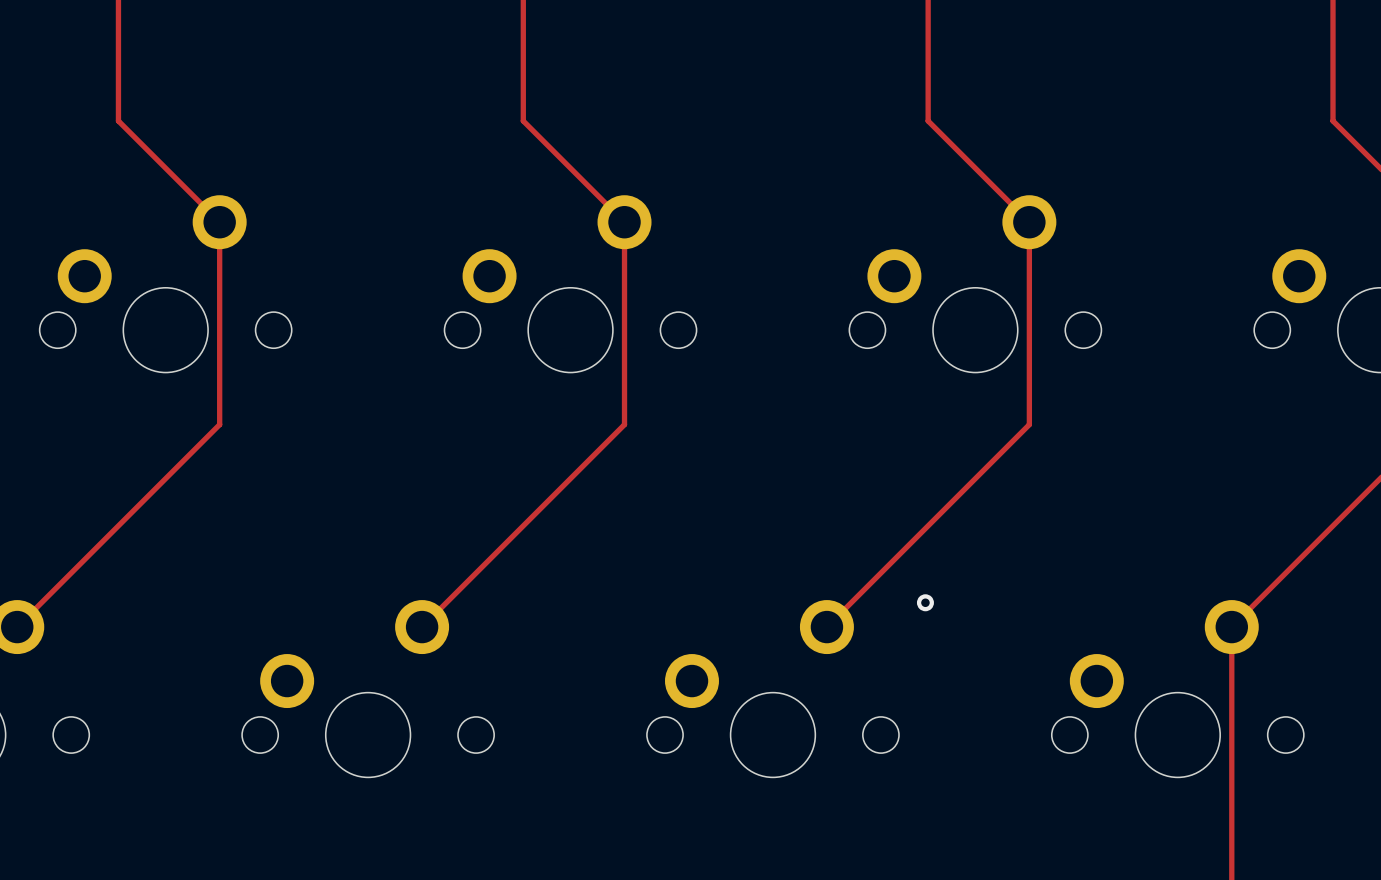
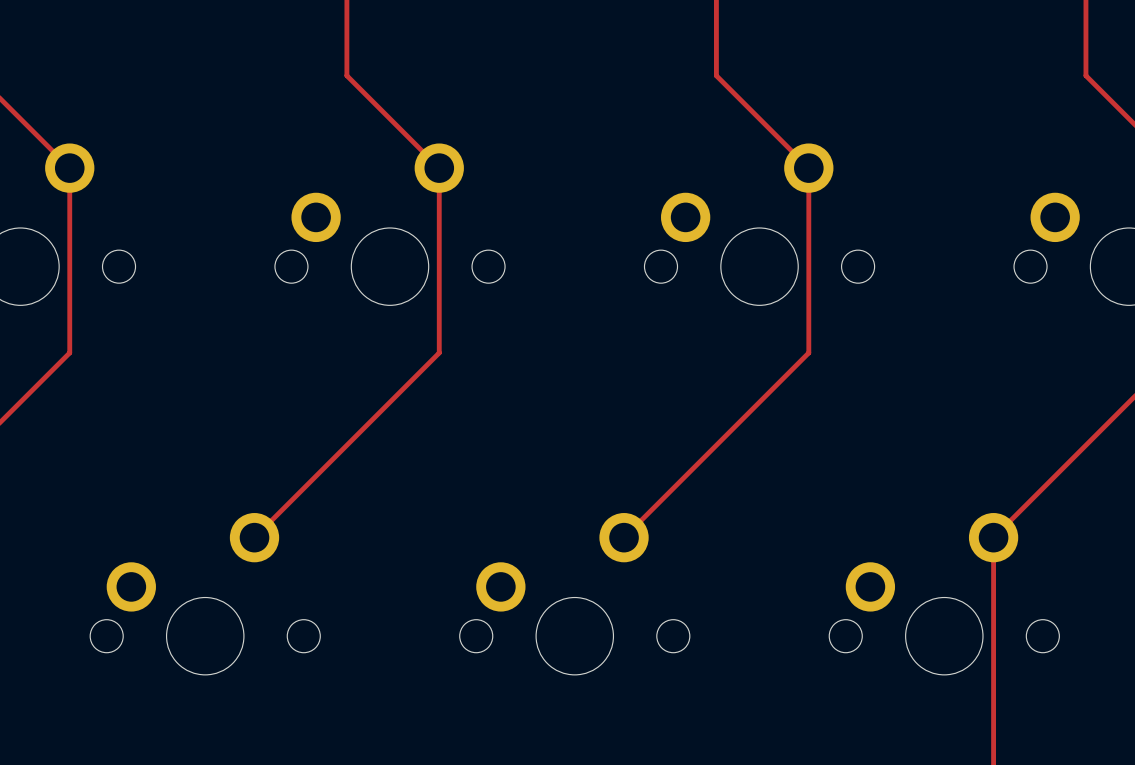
via: (925, 602) -> none

